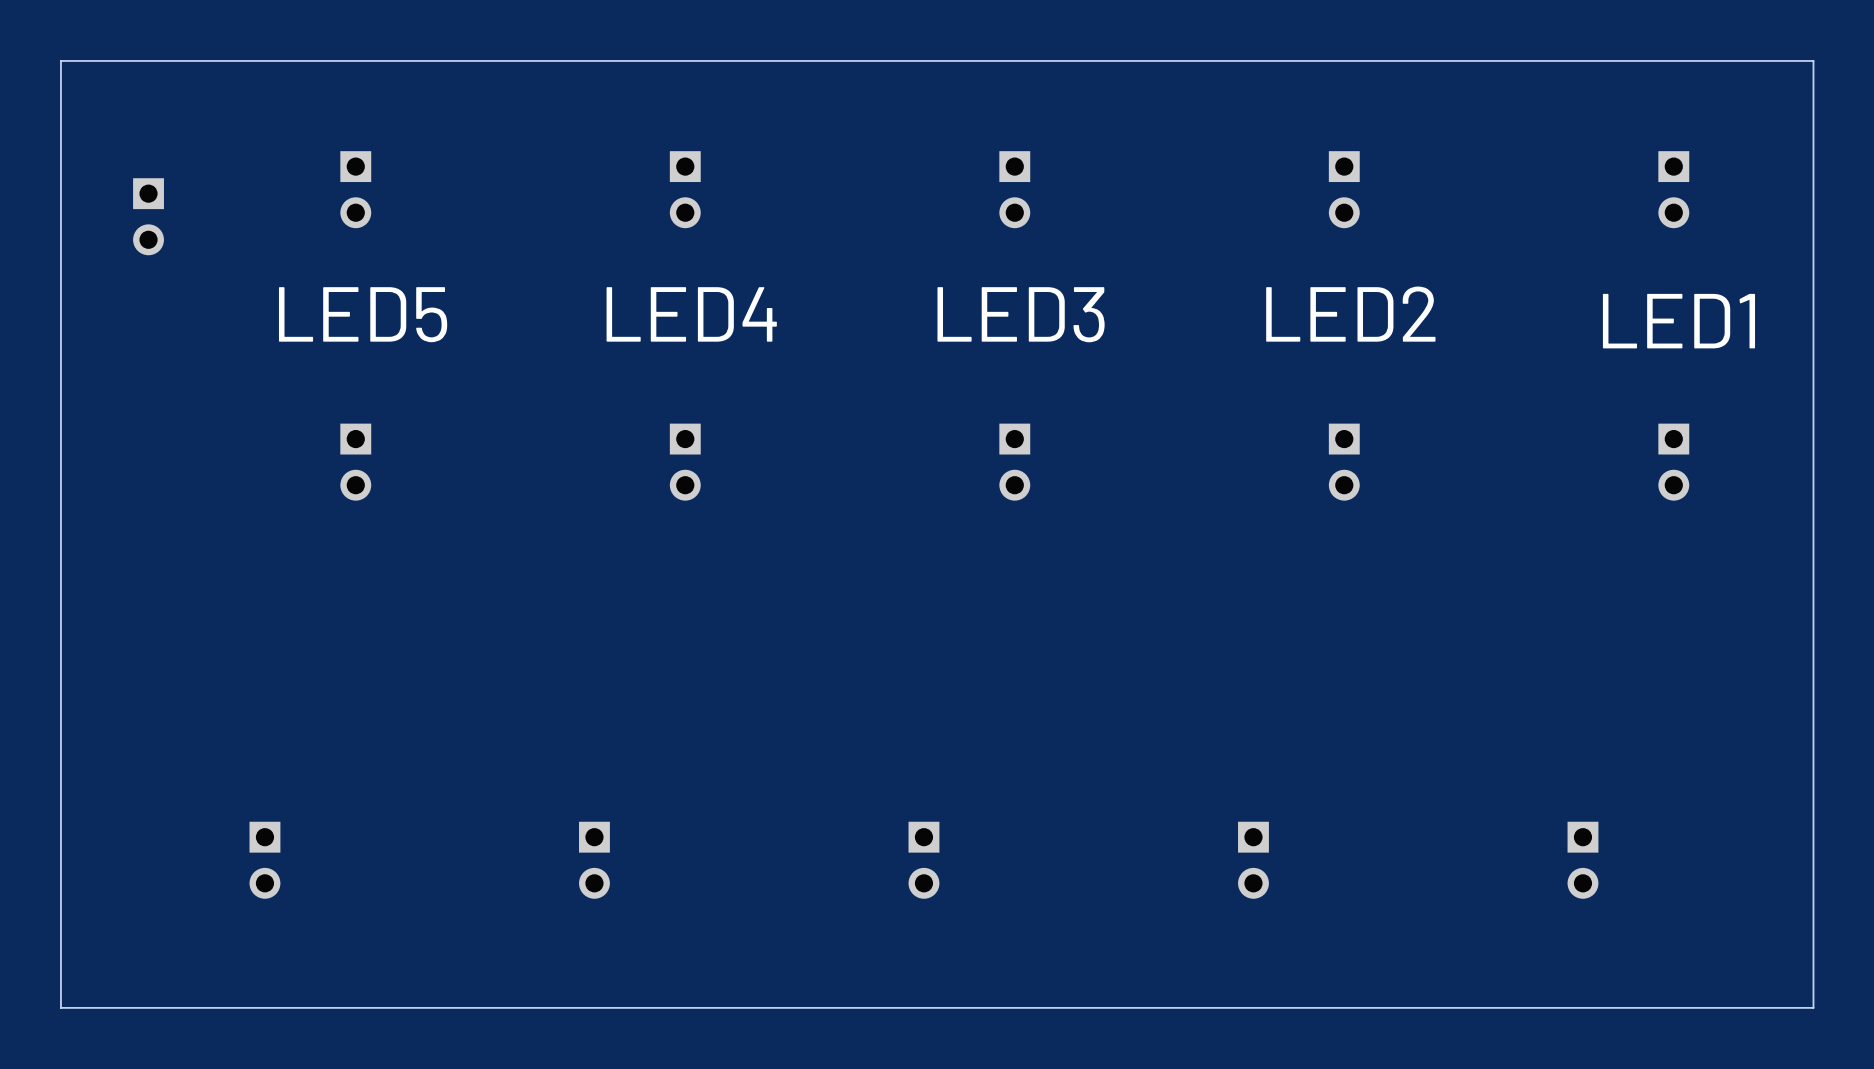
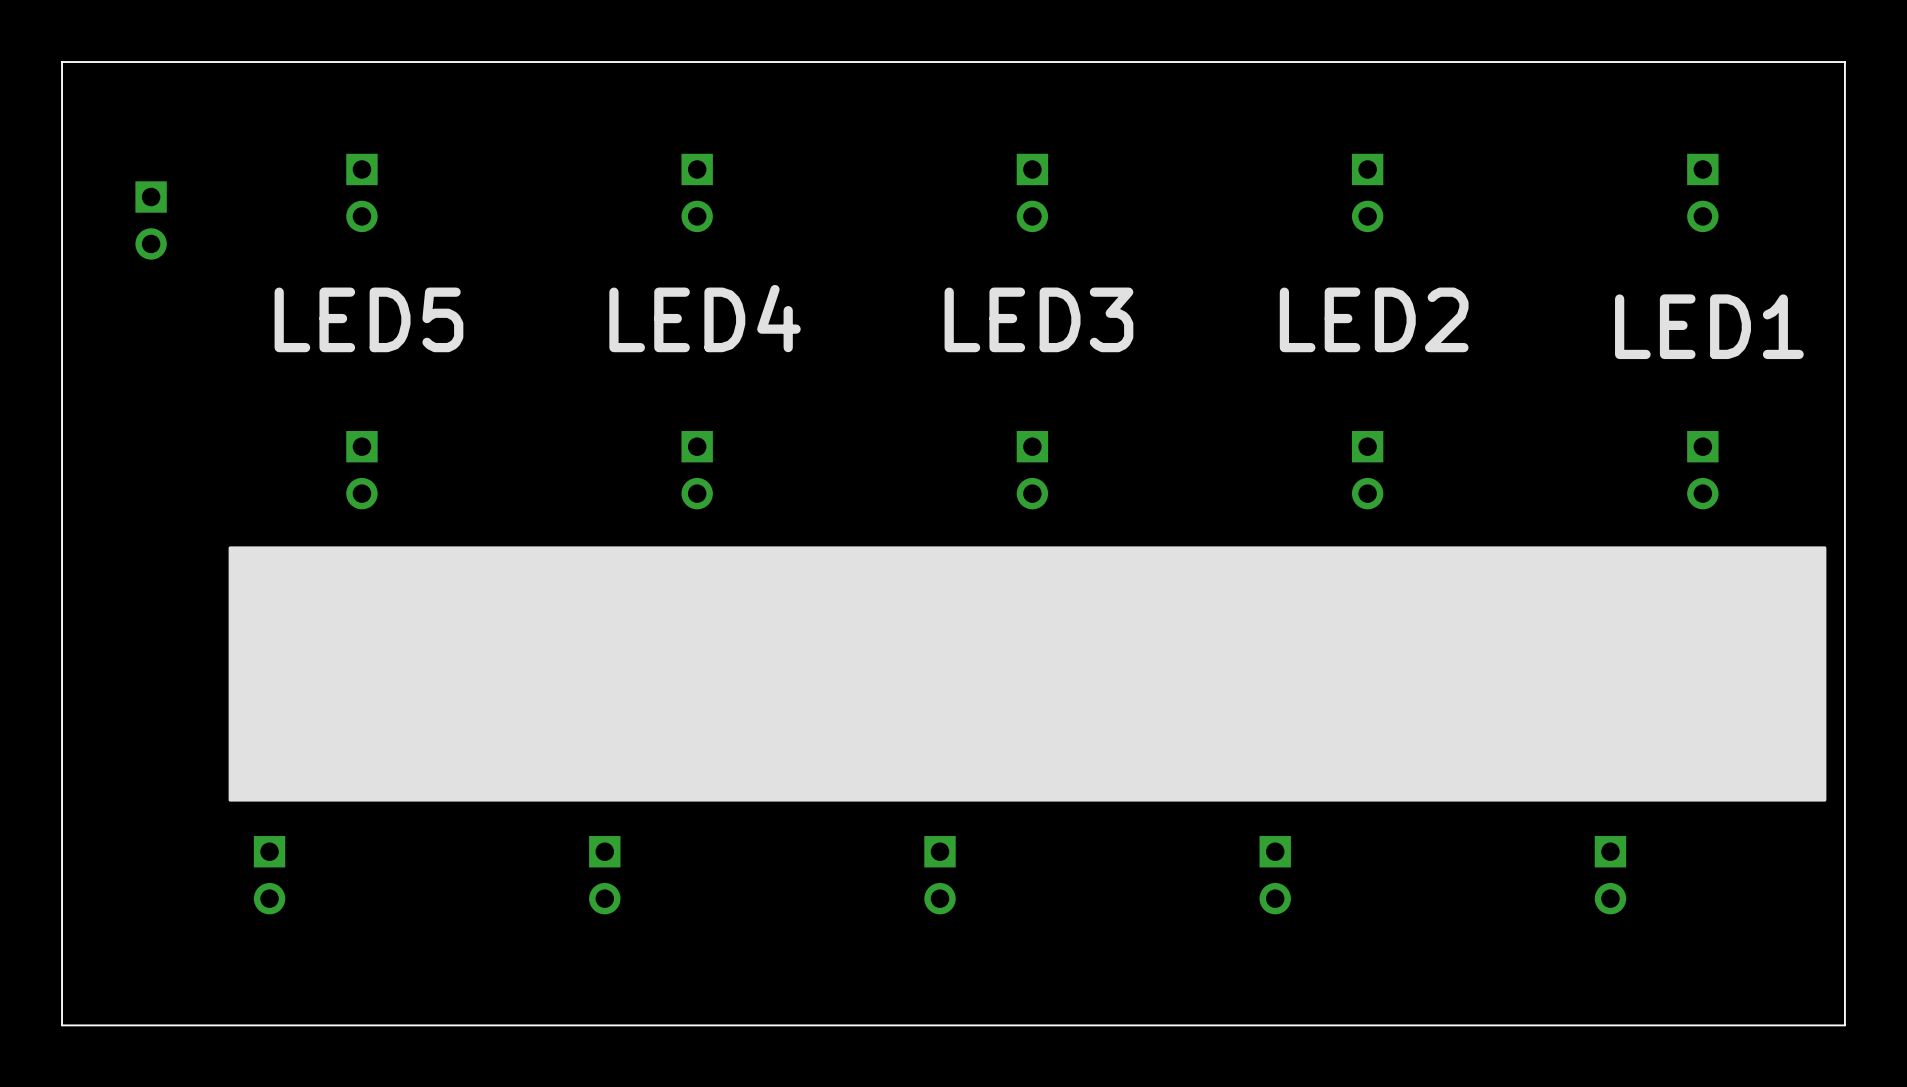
drawing: none -> [228, 546, 1827, 802]

